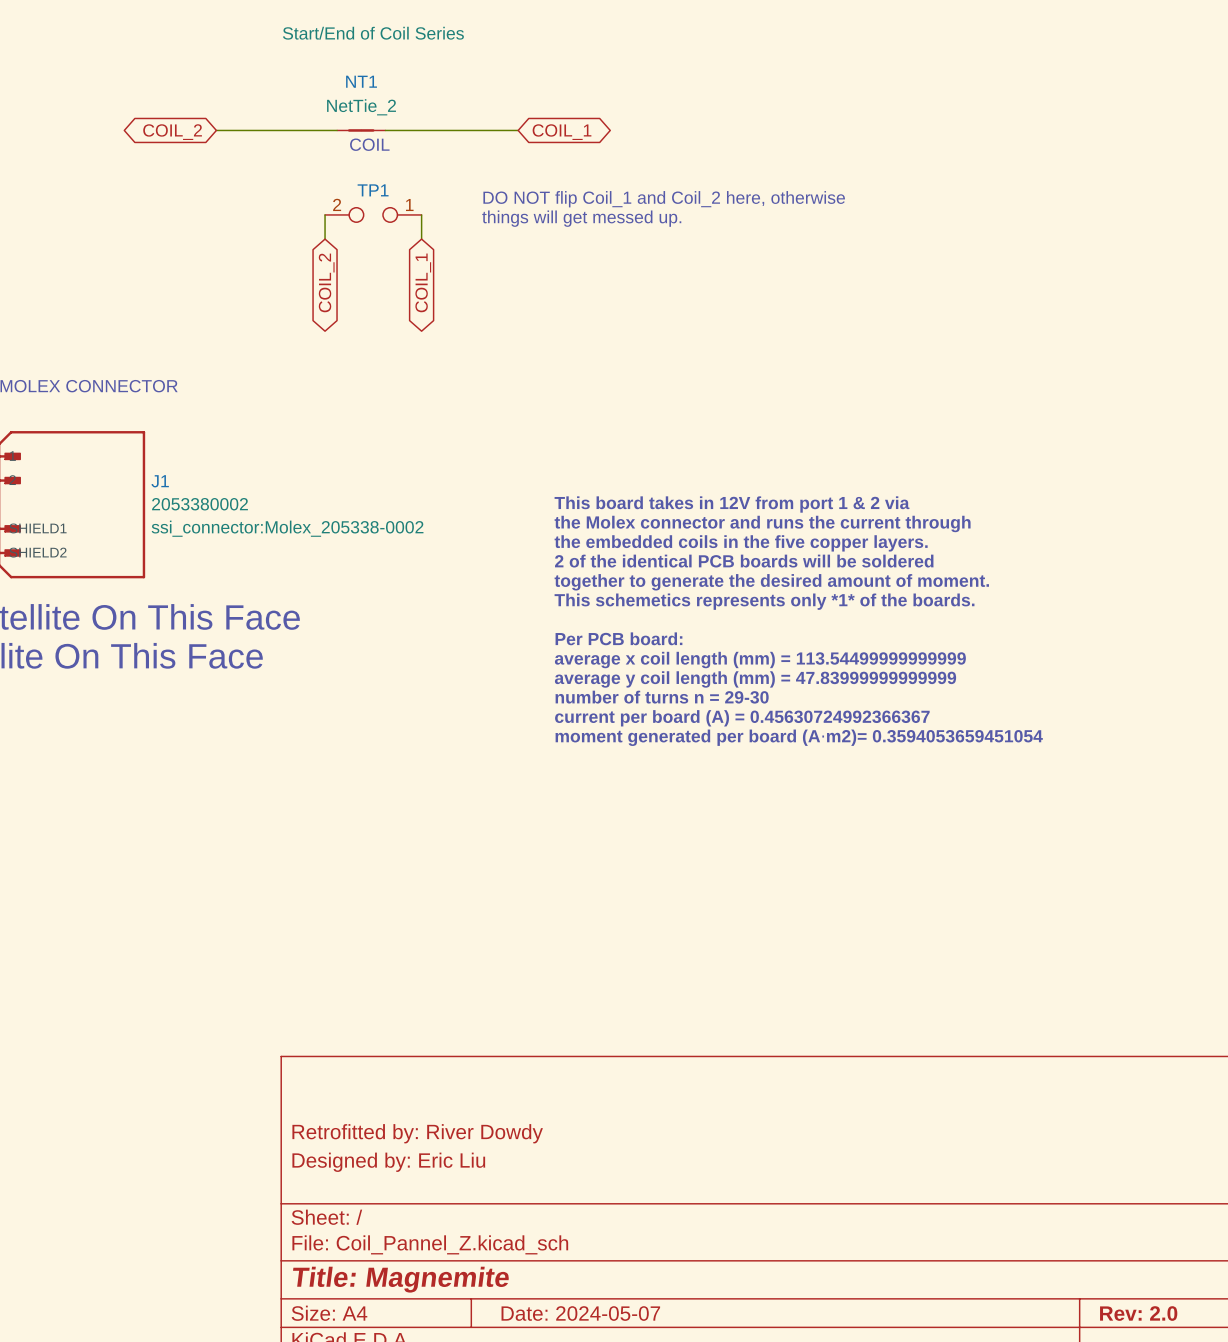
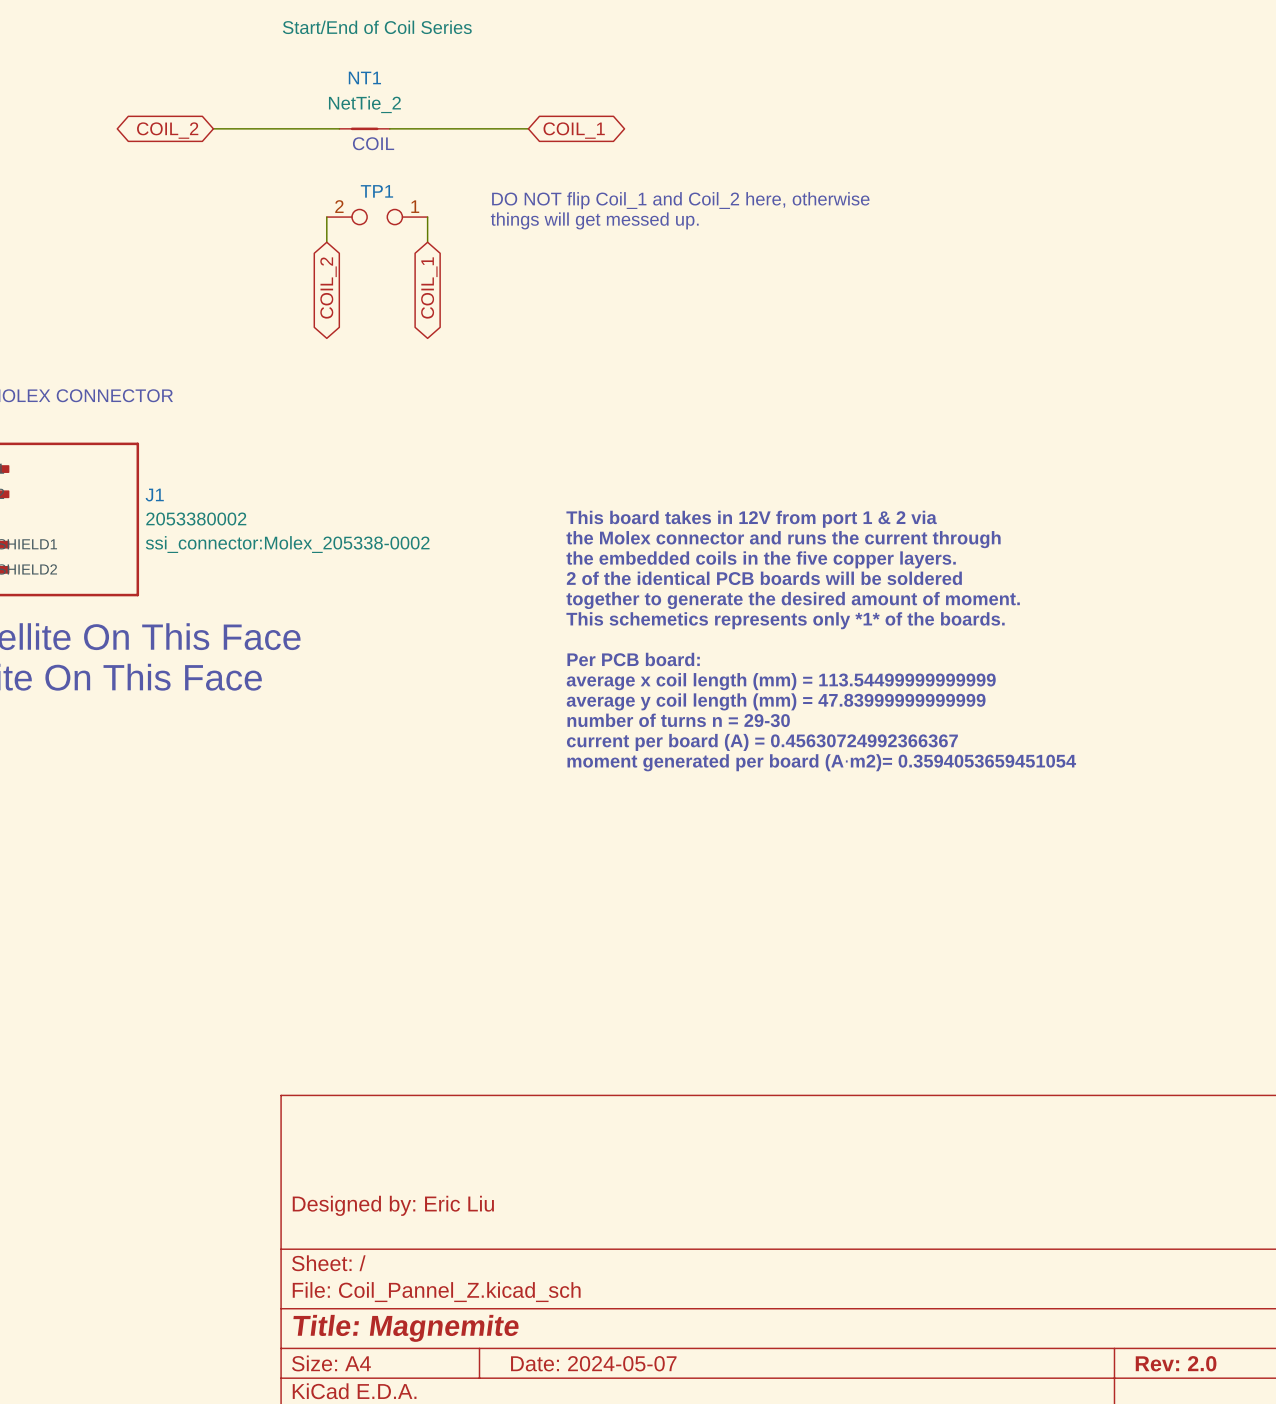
title block: Retrofitted by: River Dowdy (417, 1133) -> none

